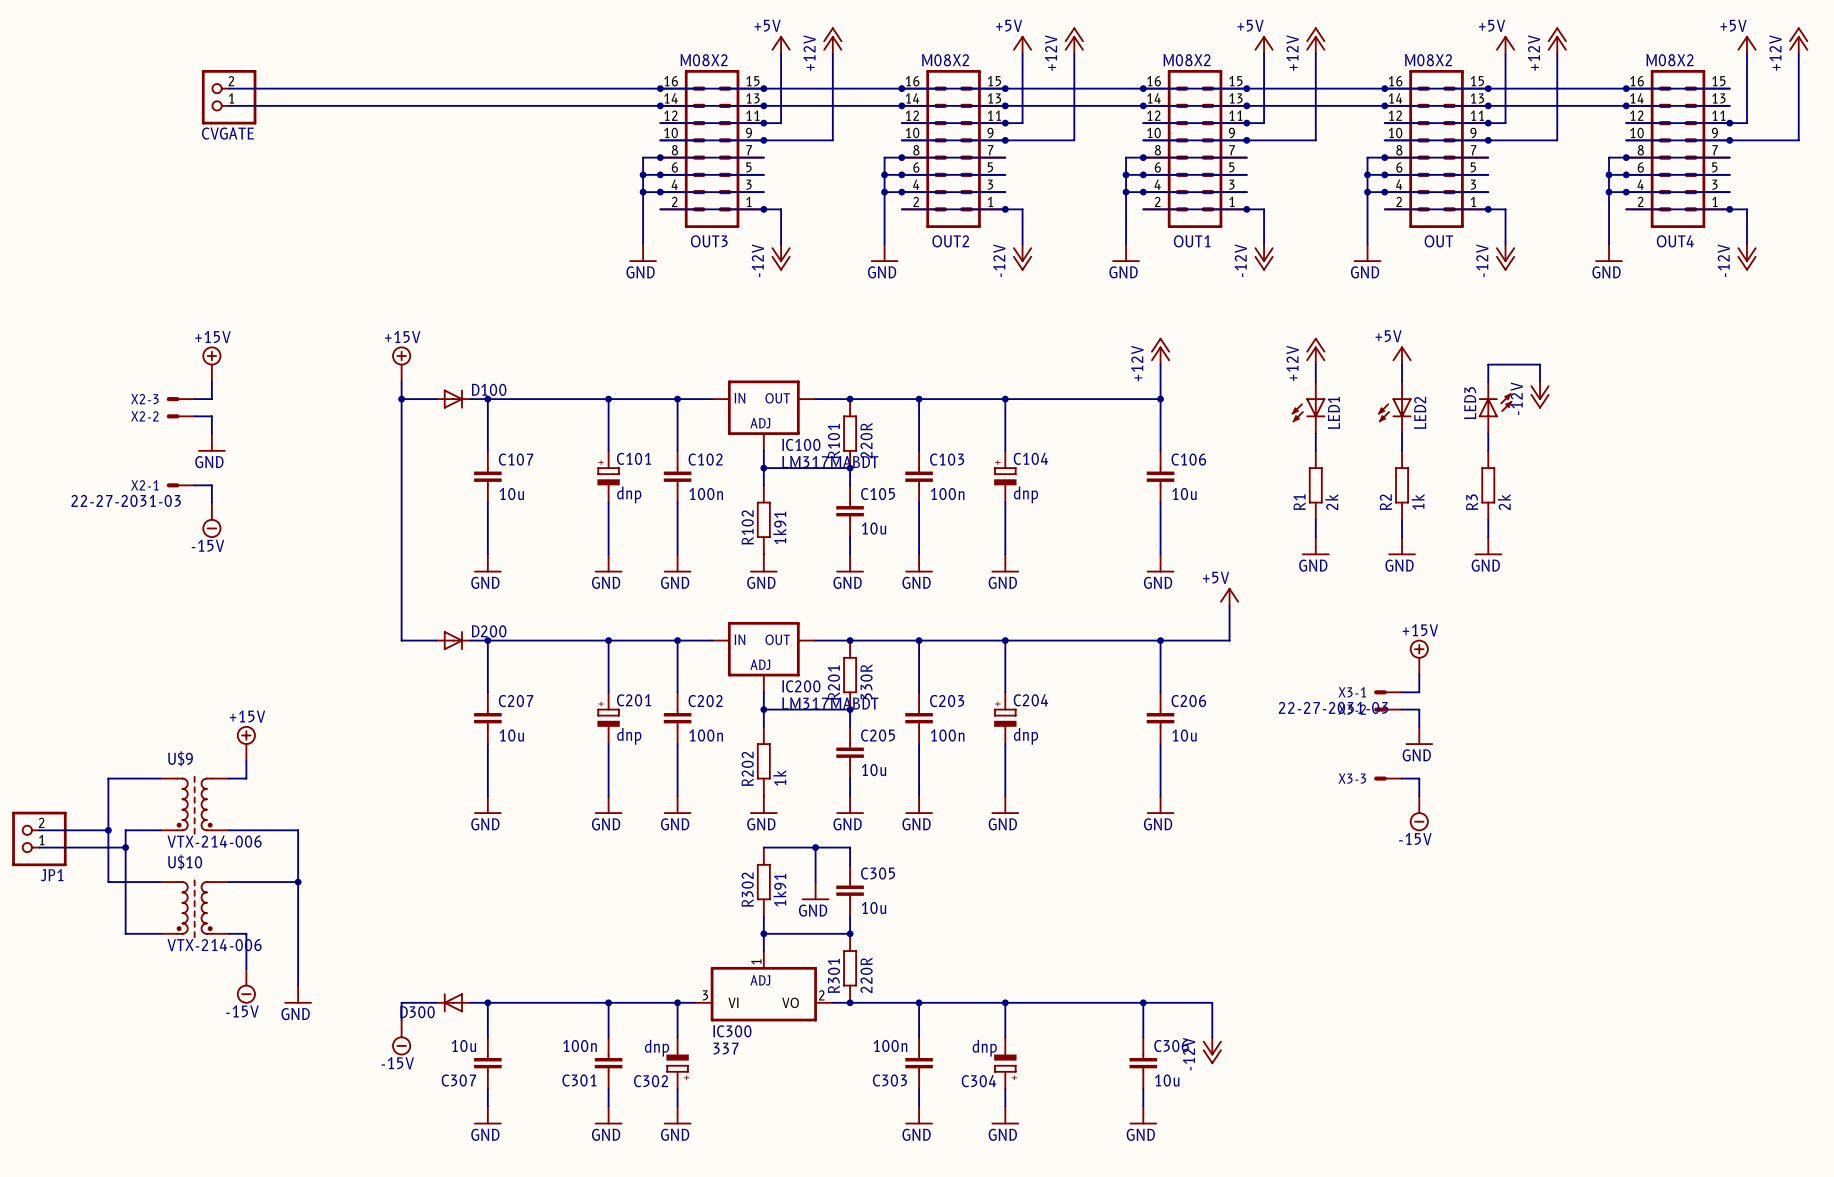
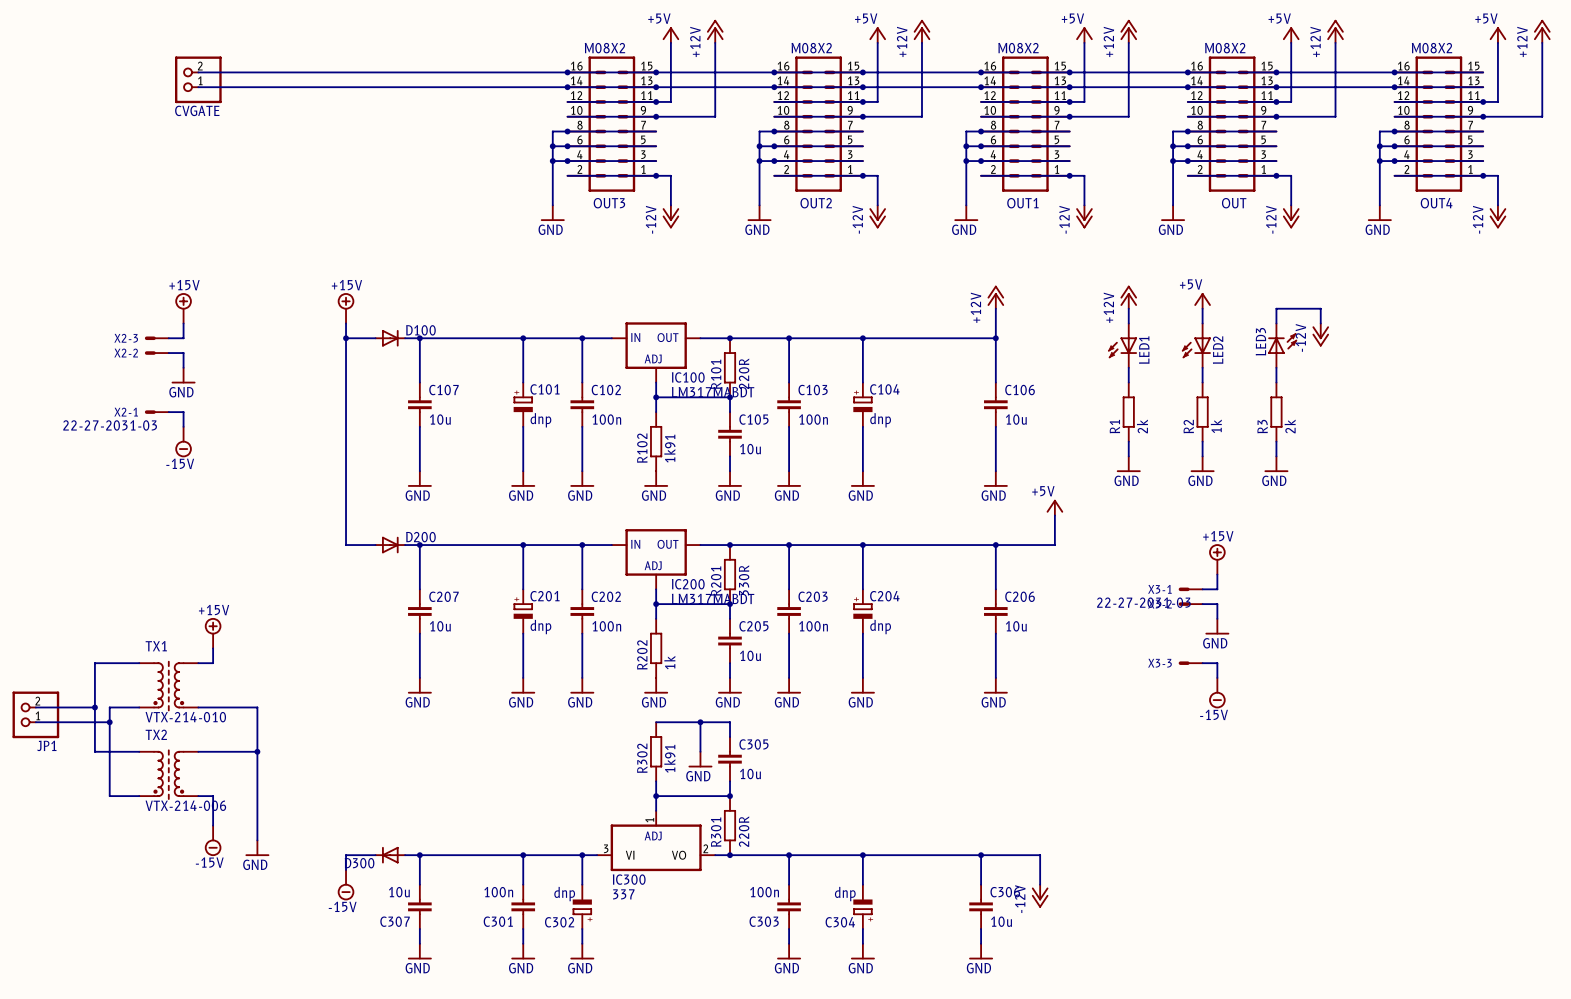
U$9 name: U$9 (180, 758) -> TX1 (156, 646)
U$9 value: VTX-214-006 (214, 841) -> VTX-214-010 (185, 717)
U$10 name: U$10 (185, 862) -> TX2 (156, 734)

